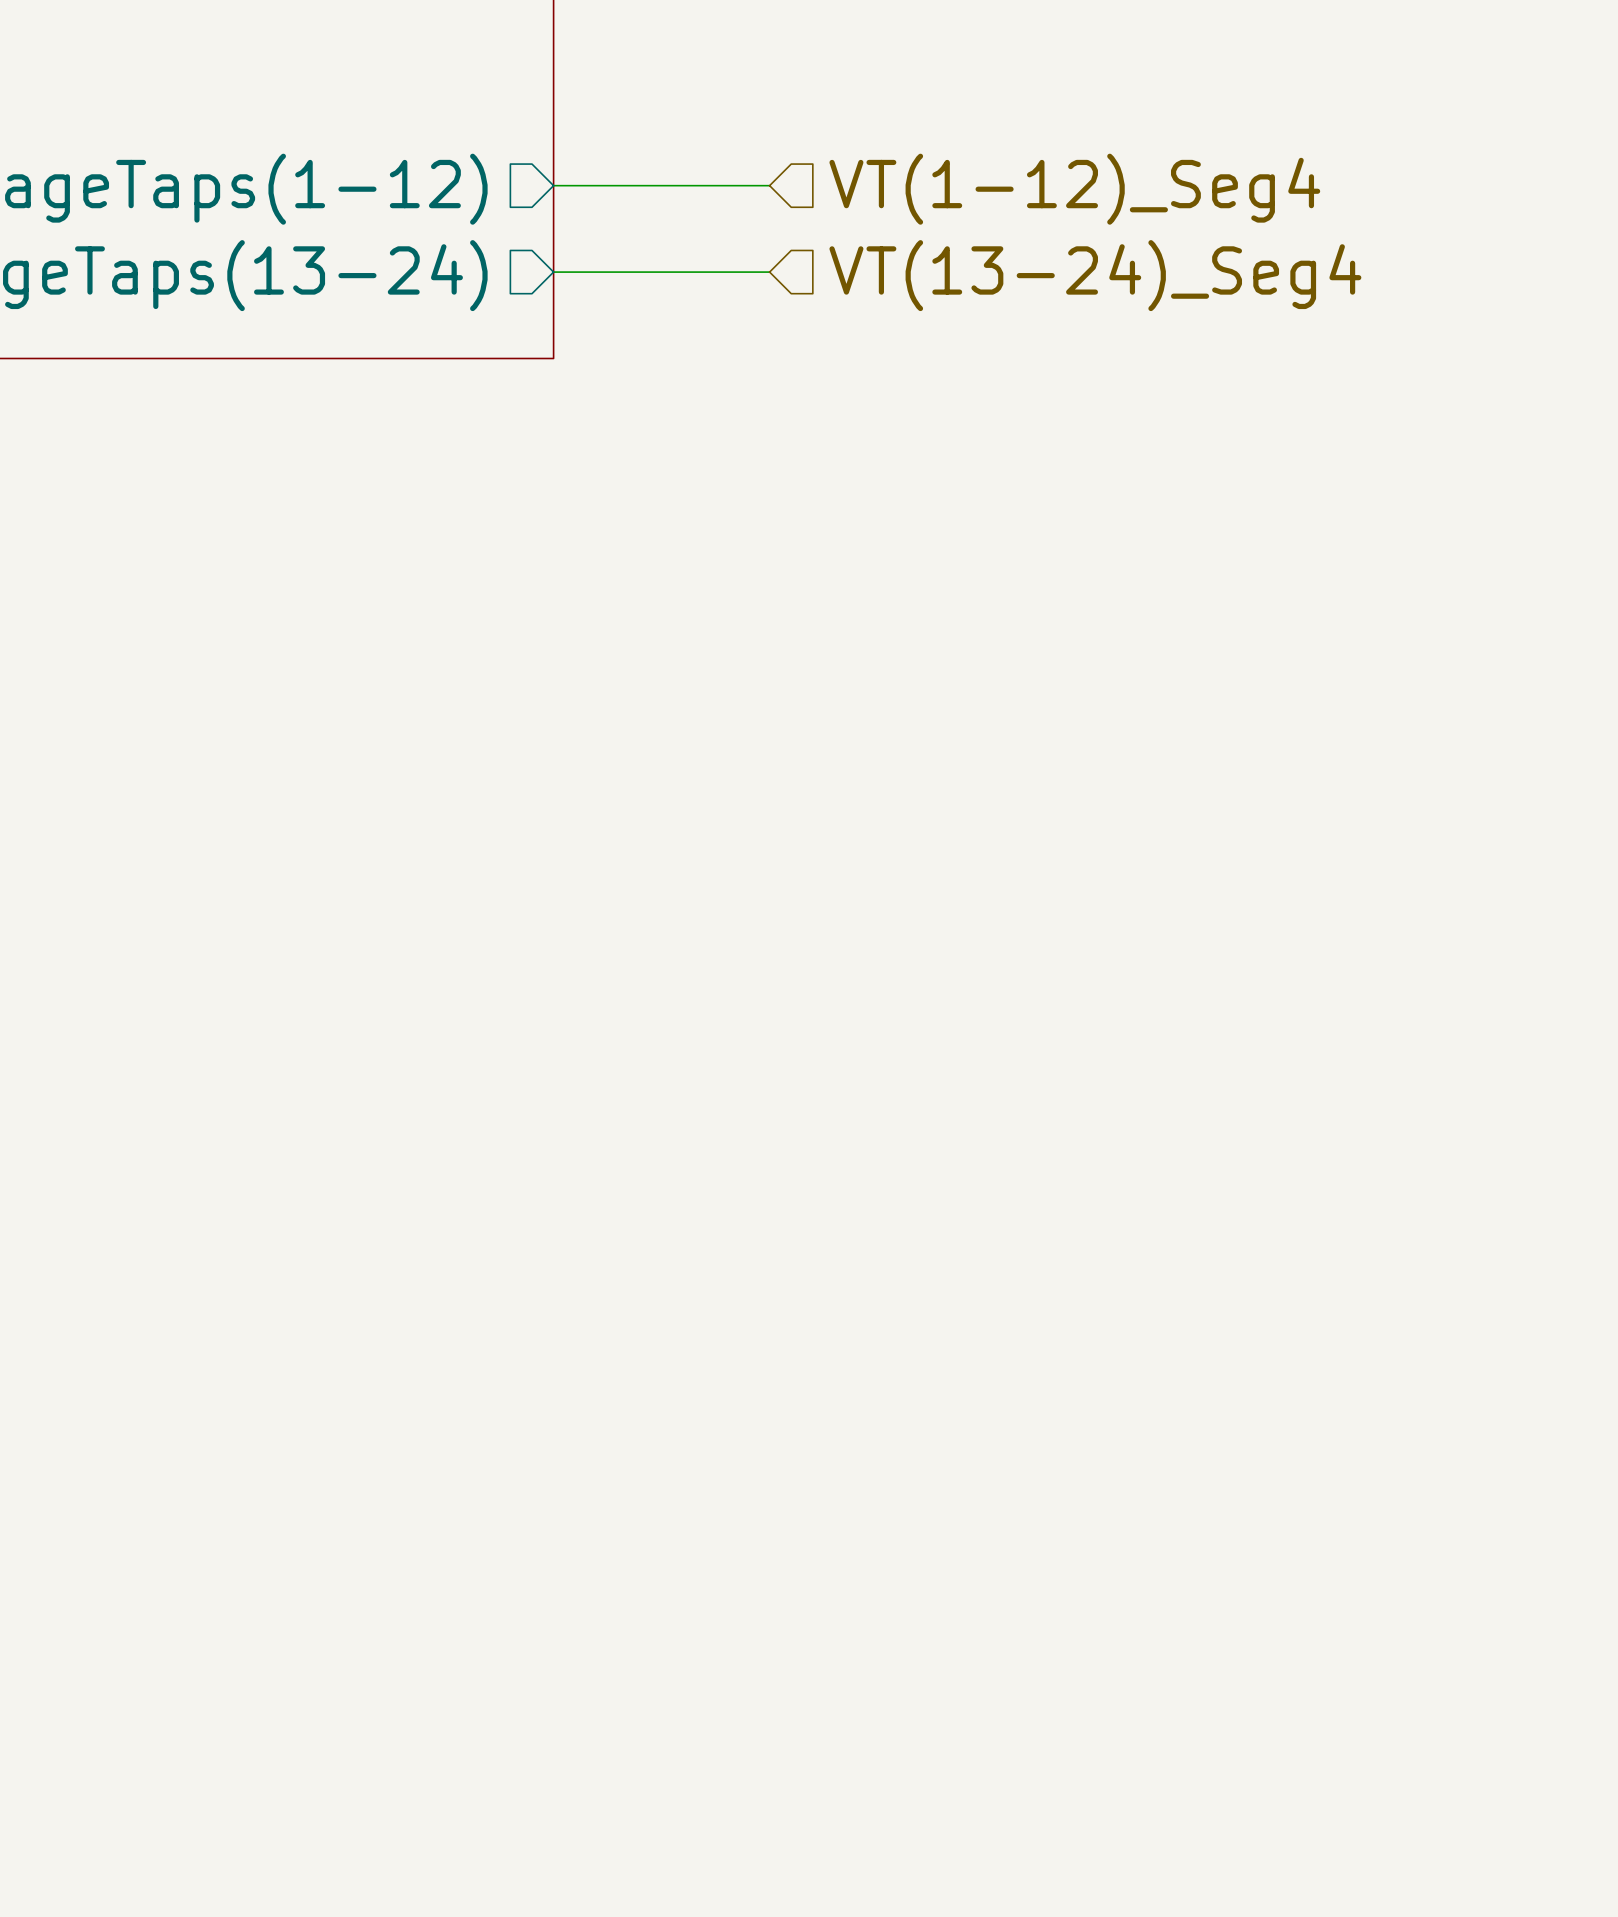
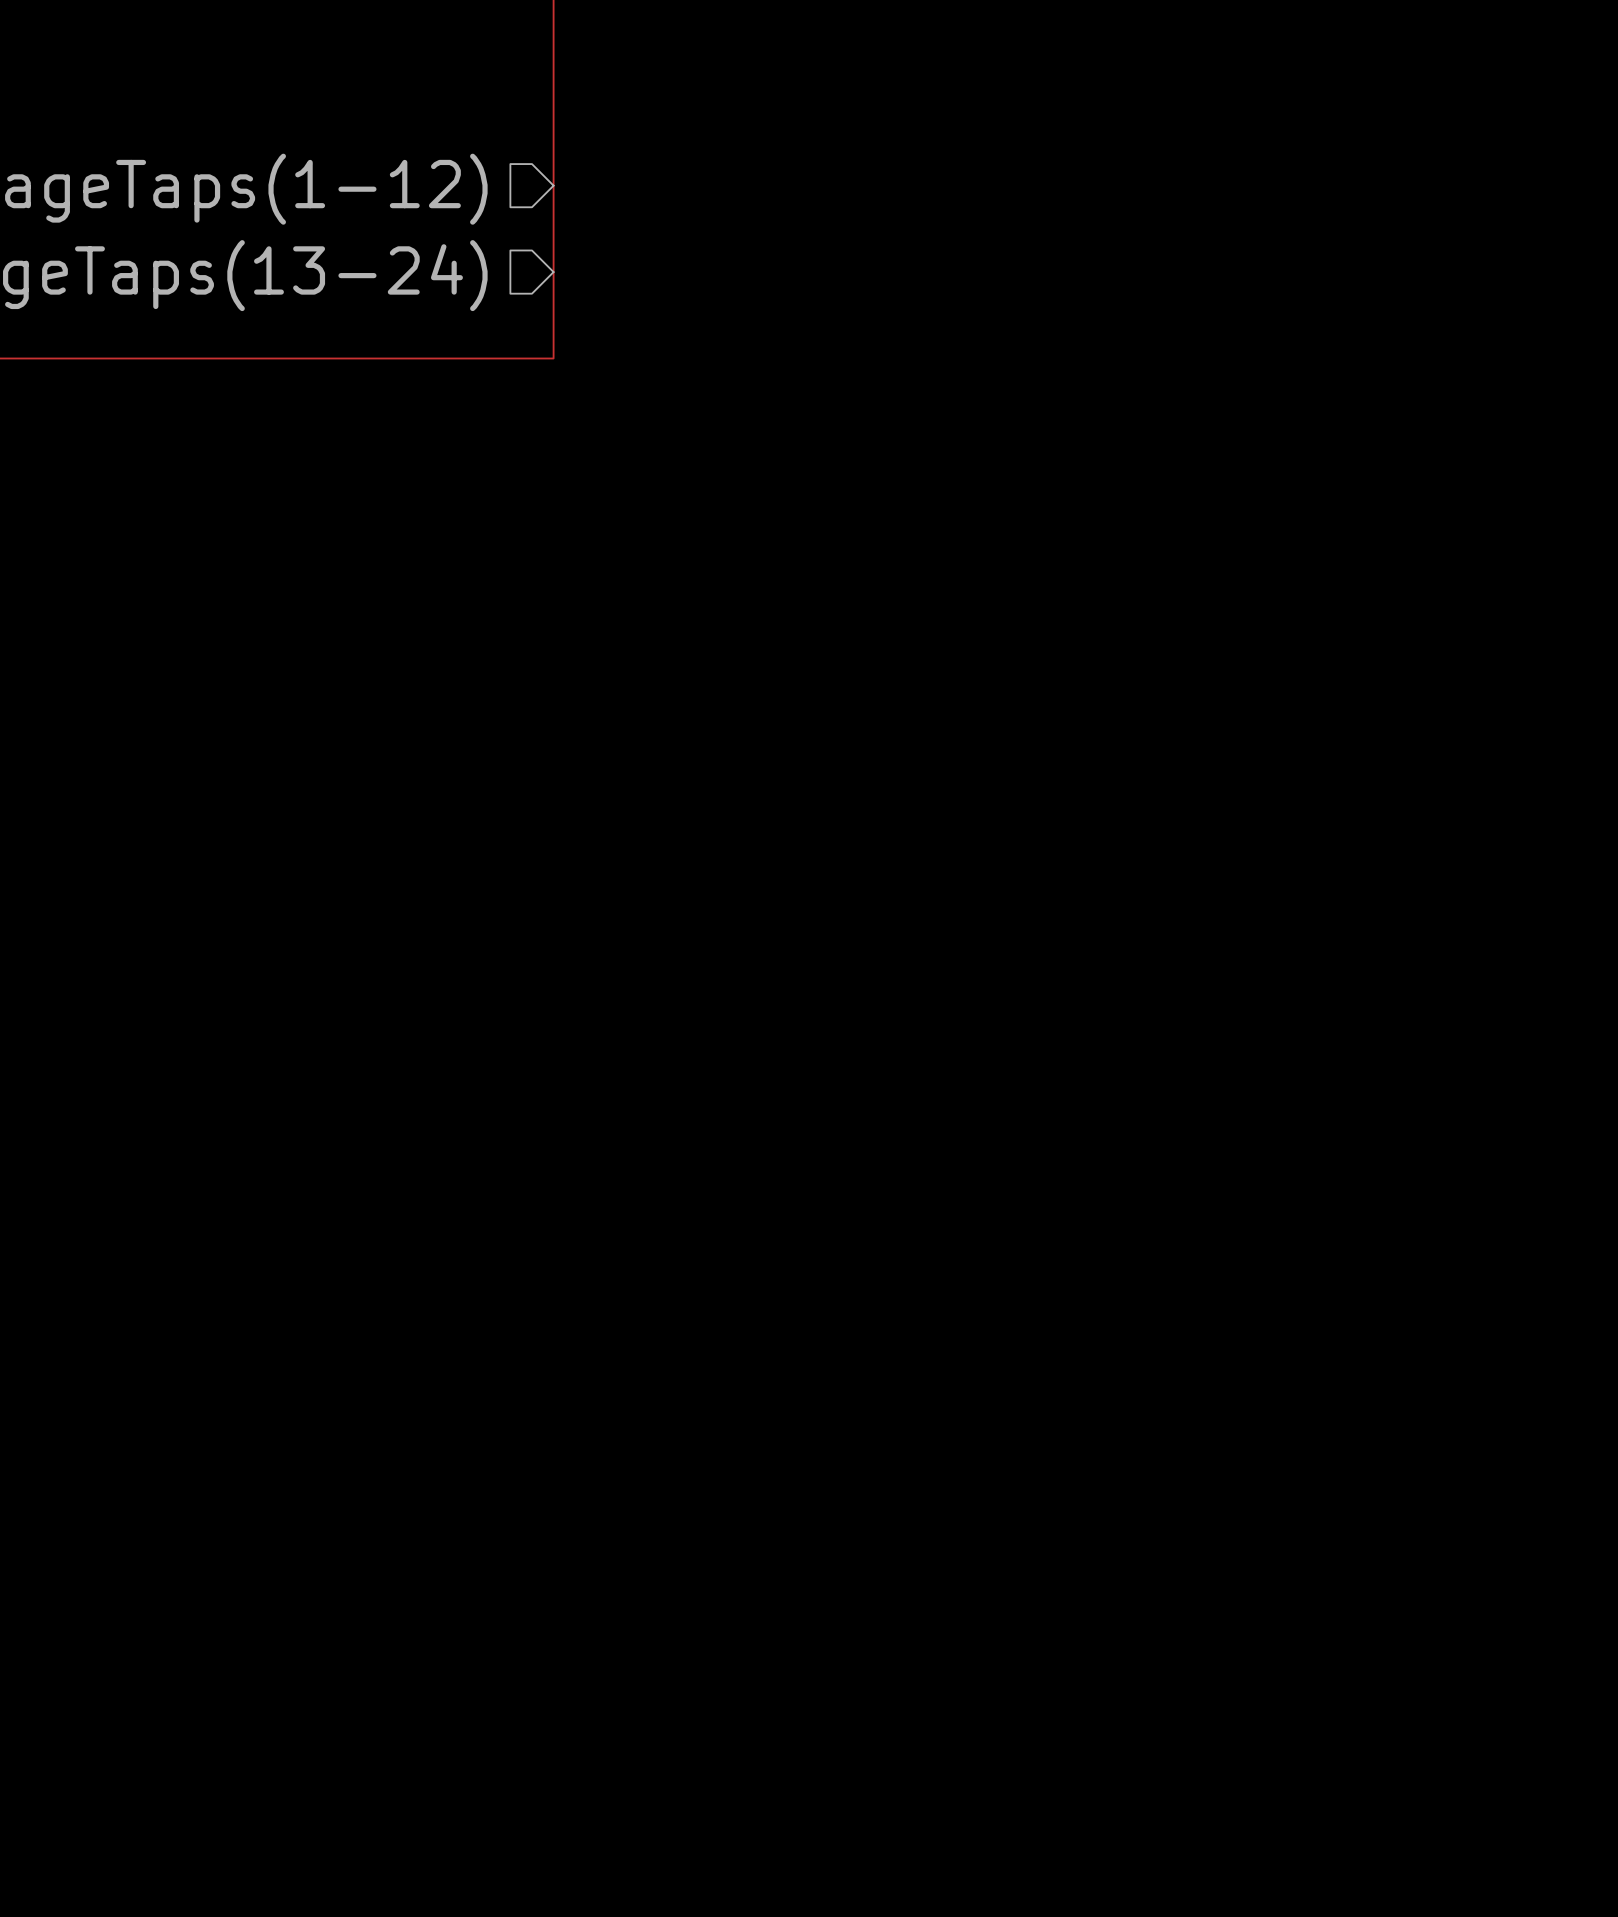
wire: (553, 185) (769, 185) -> none
hierarchical label: VT(1-12)_Seg4 (1074, 189) -> none
wire: (553, 272) (769, 272) -> none
hierarchical label: VT(13-24)_Seg4 (1095, 275) -> none

